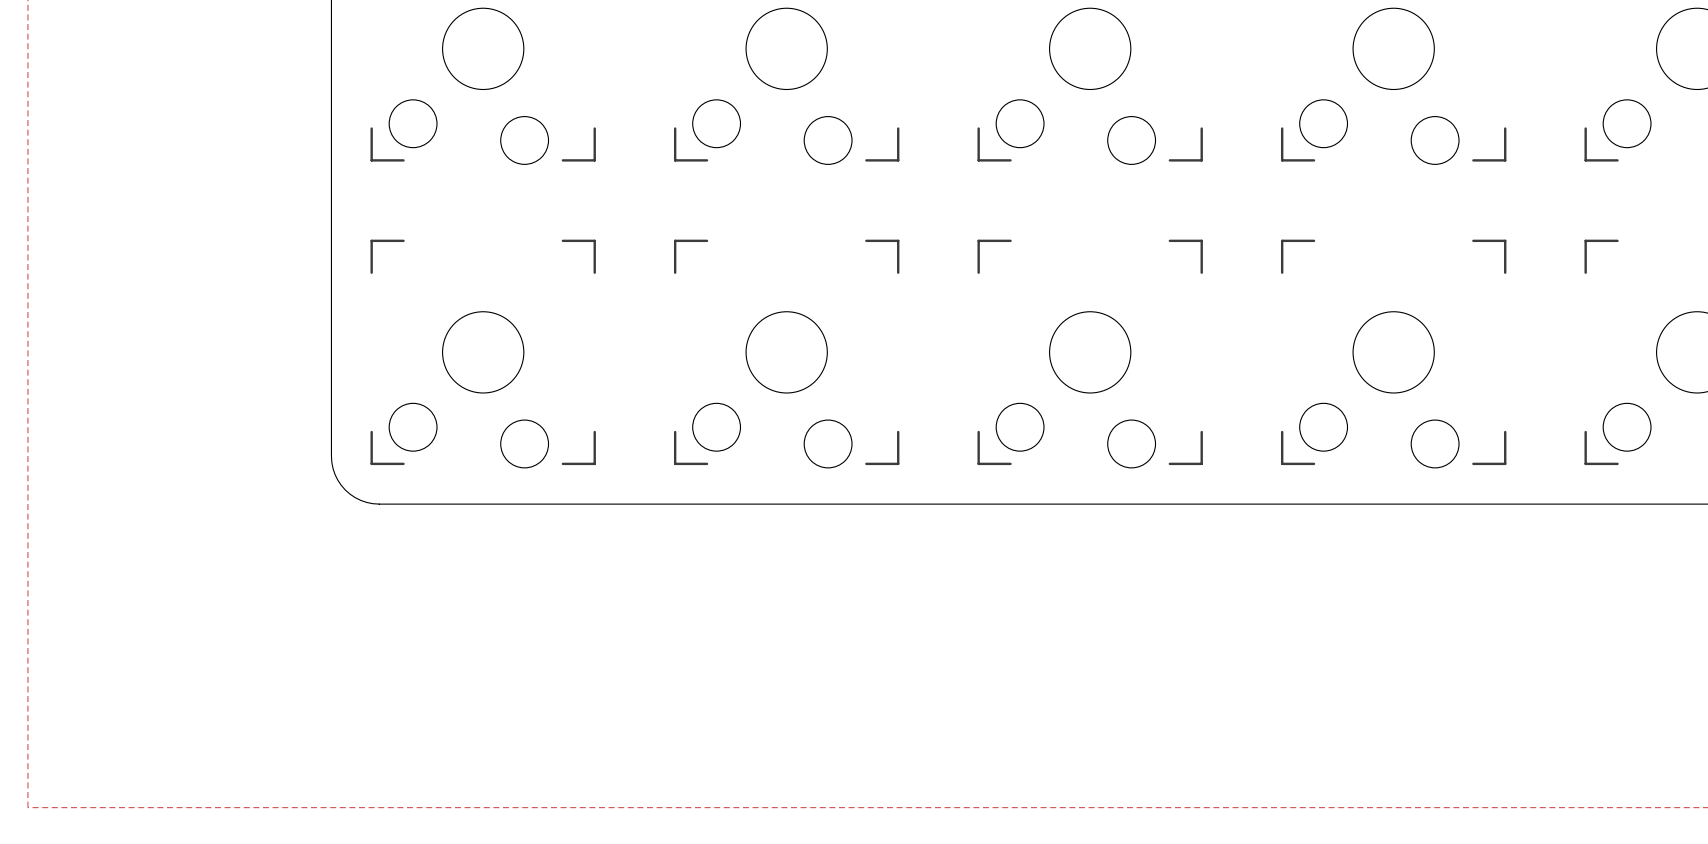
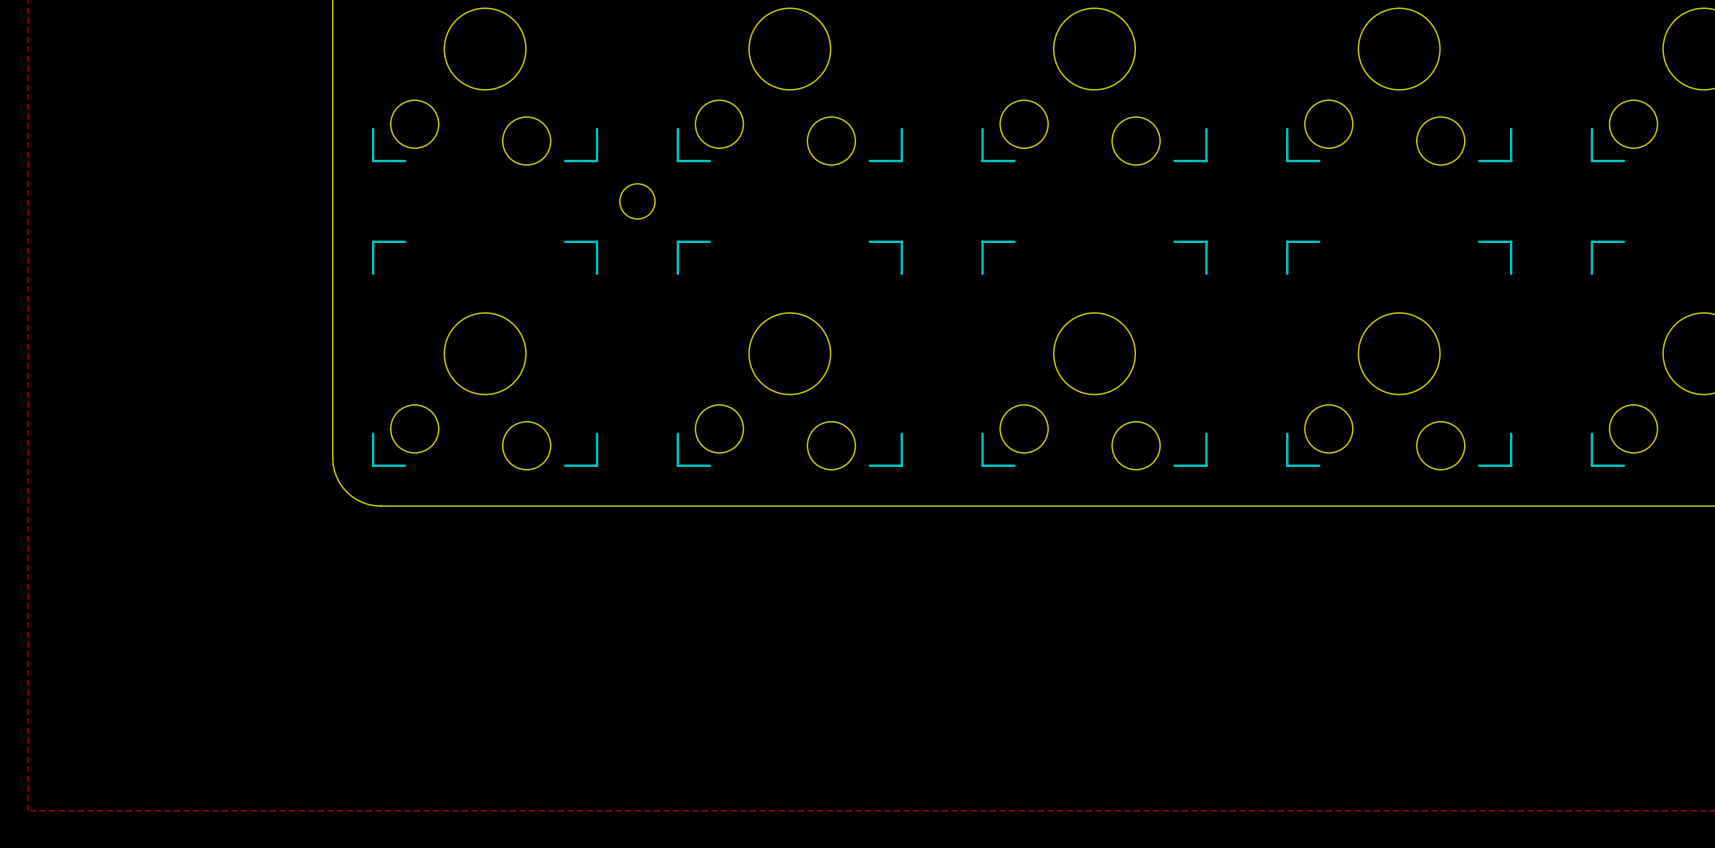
round board edge: none -> [619, 183, 656, 220]

